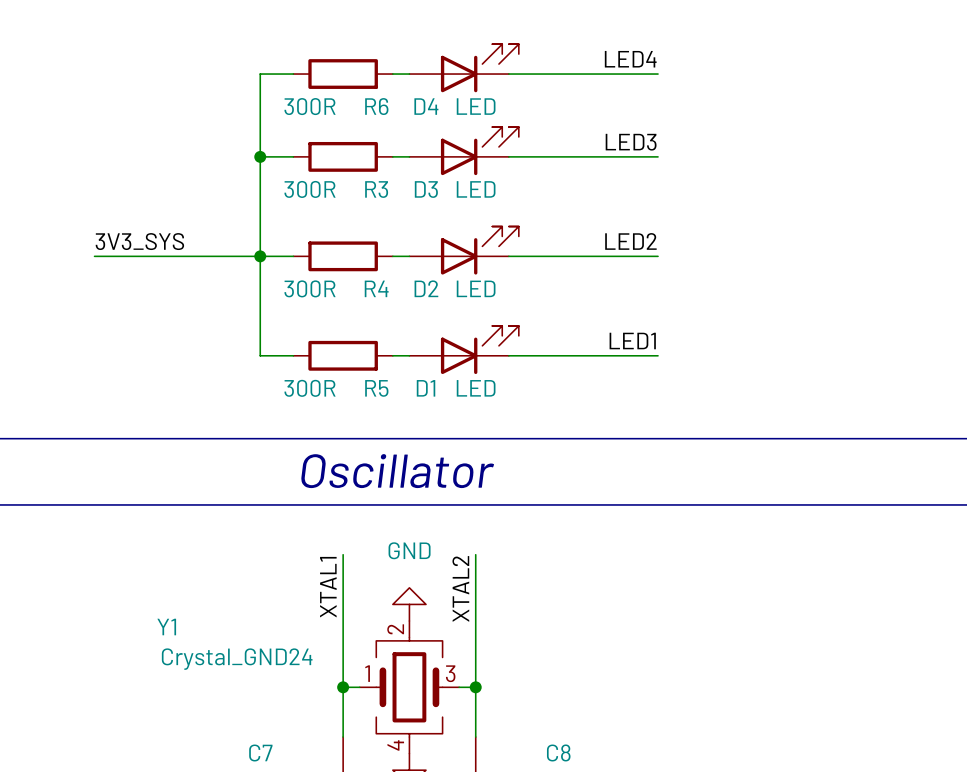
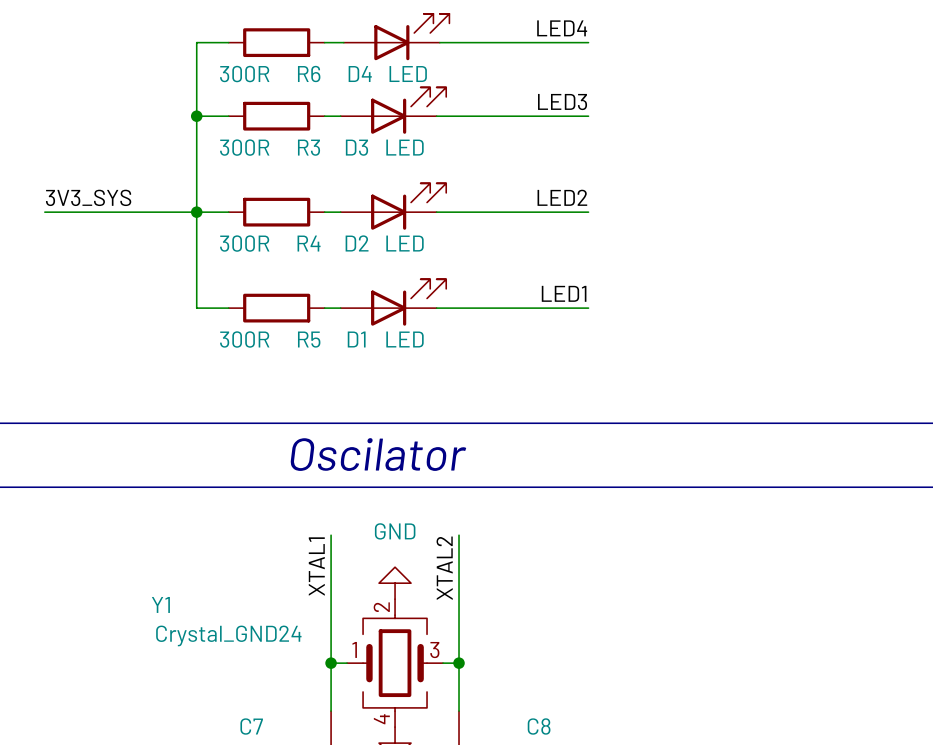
wire: none -> (228, 42) (196, 42) (196, 308) (228, 308)
wire: none -> (324, 42) (343, 42)
wire: none -> (439, 42) (588, 42)
label position: LED4 (630, 59) -> LED4 (562, 28)
D4 position: (464, 68) -> (396, 37)
wire: (293, 74) (260, 74) (260, 355) (293, 355) -> none
R6 position: (343, 74) -> (276, 42)
wire: (392, 74) (409, 74) -> none
wire: (508, 74) (658, 74) -> none
junction: none -> (196, 116)
wire: none -> (436, 116) (588, 116)
label position: LED3 (631, 142) -> LED3 (562, 102)
D3 position: (464, 151) -> (393, 110)
wire: (260, 156) (293, 156) -> (196, 116) (228, 116)
junction: (260, 156) -> none
R3 position: (343, 156) -> (276, 116)
wire: (392, 156) (409, 156) -> (324, 116) (340, 116)
wire: (508, 156) (658, 156) -> none
wire: none -> (44, 212) (228, 212)
junction: none -> (196, 212)
wire: none -> (436, 212) (588, 212)
label position: 3V3_SYS (139, 241) -> 3V3_SYS (88, 197)
label position: LED2 (630, 241) -> LED2 (562, 197)
D2 position: (464, 250) -> (393, 206)
wire: (94, 256) (293, 256) -> none
junction: (260, 256) -> none
R4 position: (343, 256) -> (276, 212)
wire: (392, 256) (409, 256) -> (324, 212) (340, 212)
wire: (508, 256) (658, 256) -> none
wire: none -> (436, 308) (588, 308)
label position: LED1 (632, 341) -> LED1 (564, 293)
D1 position: (464, 350) -> (393, 302)
R5 position: (343, 355) -> (276, 308)
wire: (392, 355) (409, 355) -> (324, 308) (340, 308)
wire: (508, 355) (658, 355) -> none
text: Oscillator (397, 471) -> Oscilator (378, 454)

